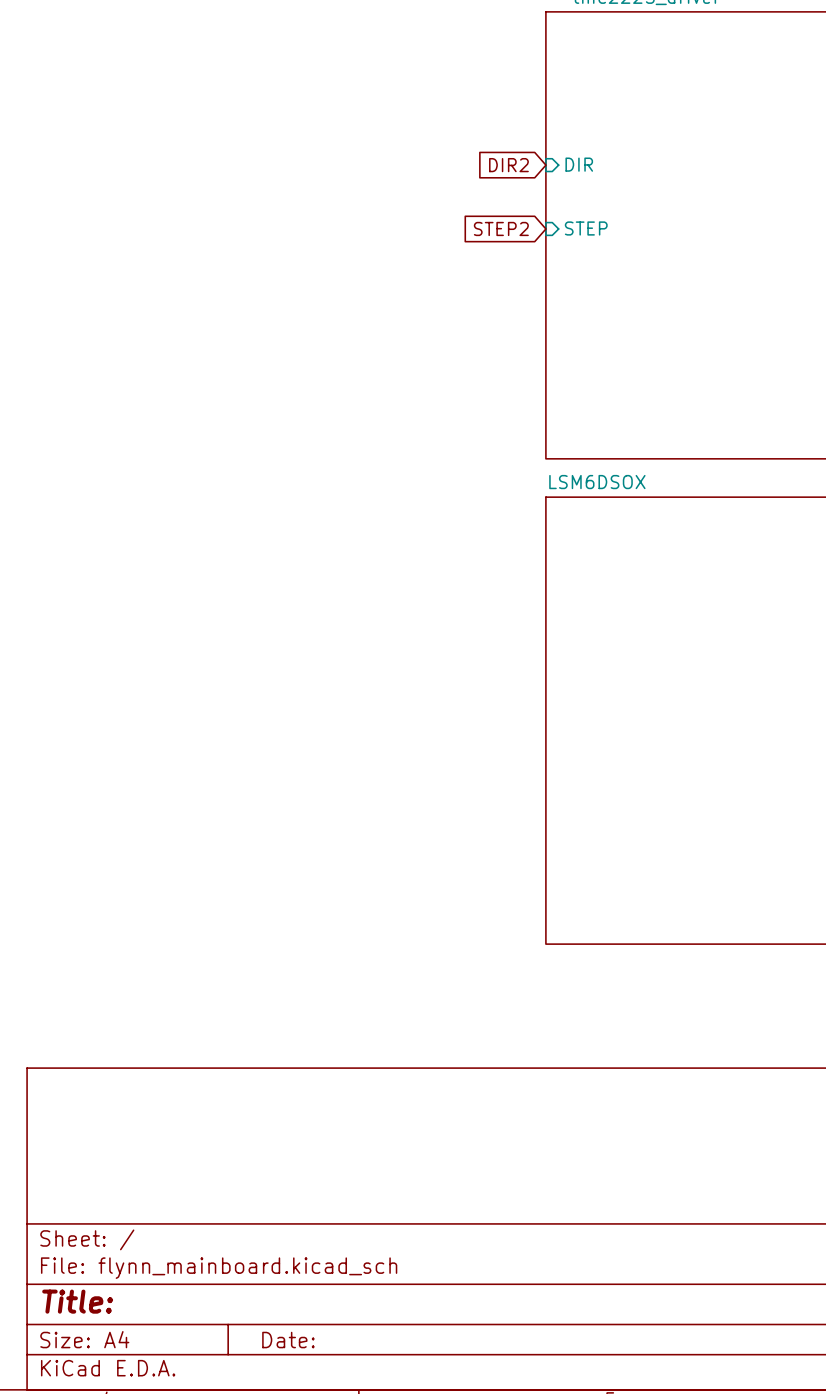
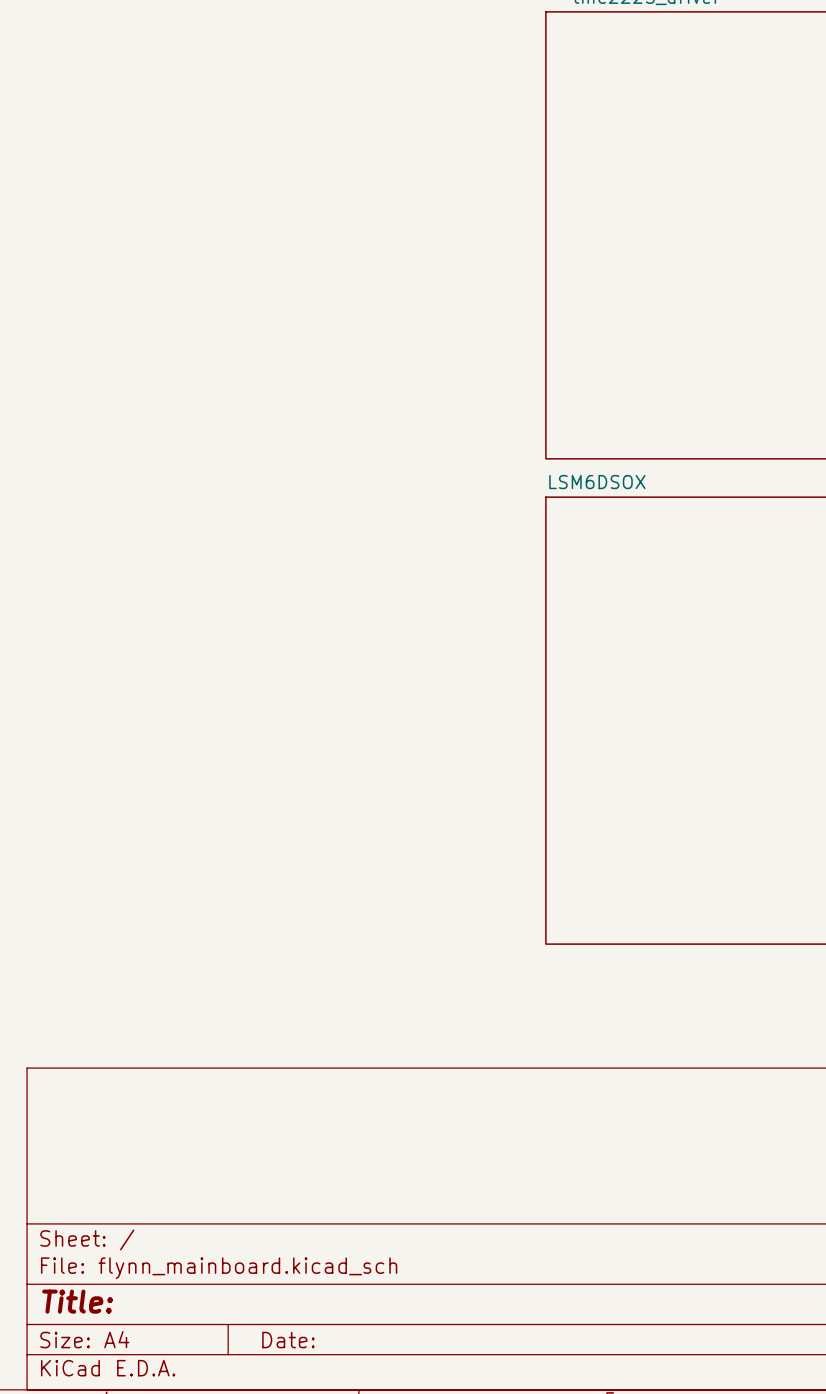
sheet pin: DIR (579, 164) -> none
global label: DIR2 (508, 165) -> none
global label: STEP2 (501, 228) -> none
sheet pin: STEP (586, 228) -> none

